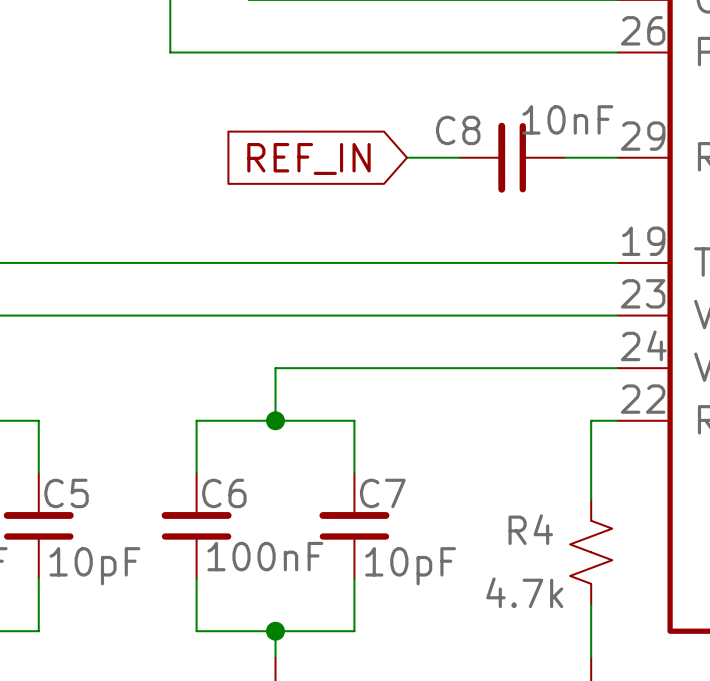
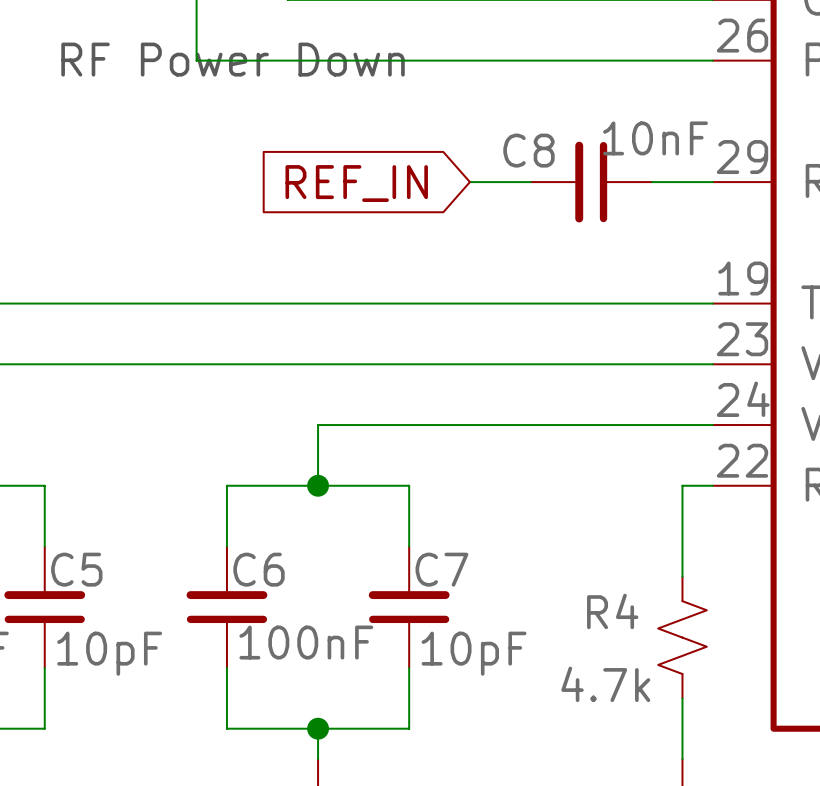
text: none -> RF Power Down (233, 59)

